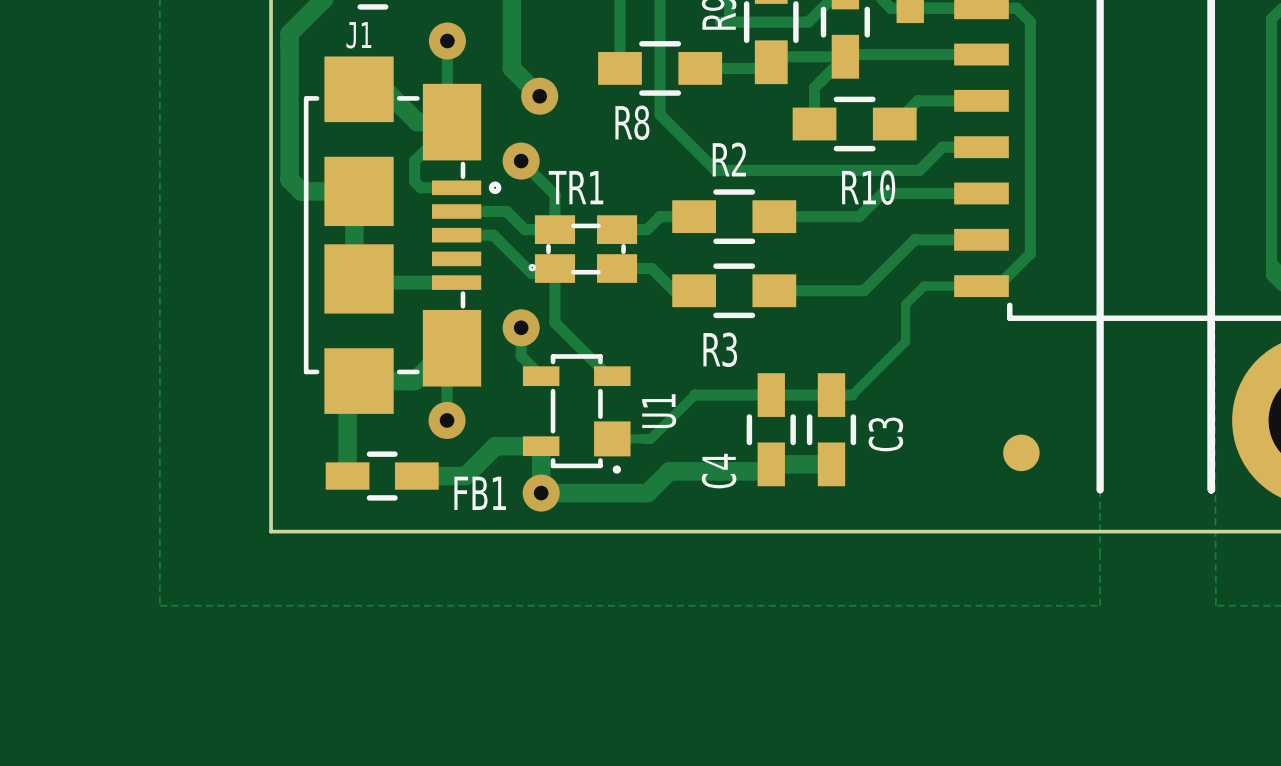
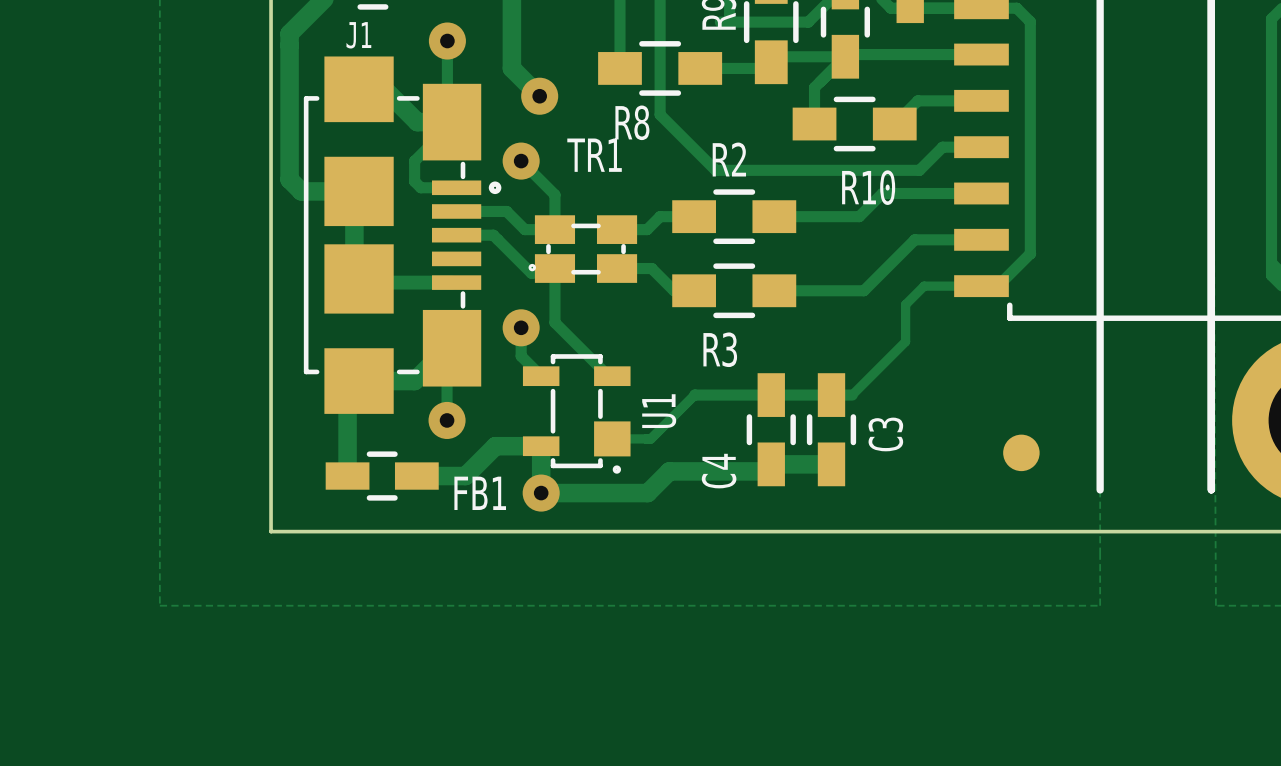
TR1 name position: TR1 (576, 187) -> TR1 (594, 155)

